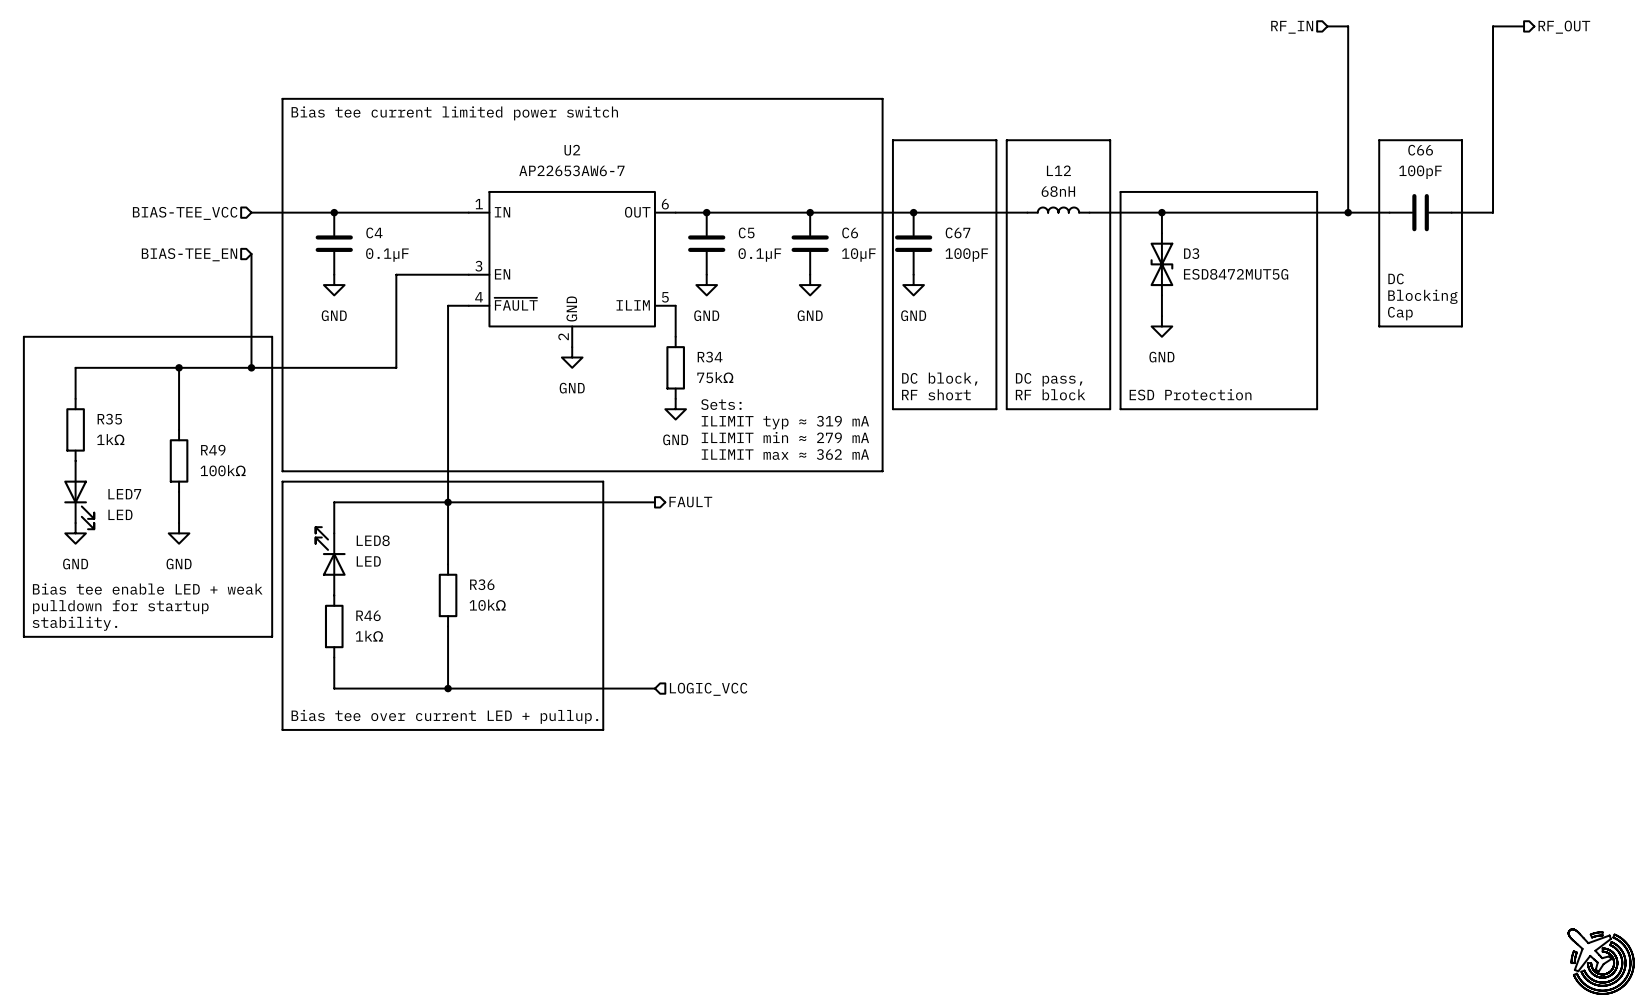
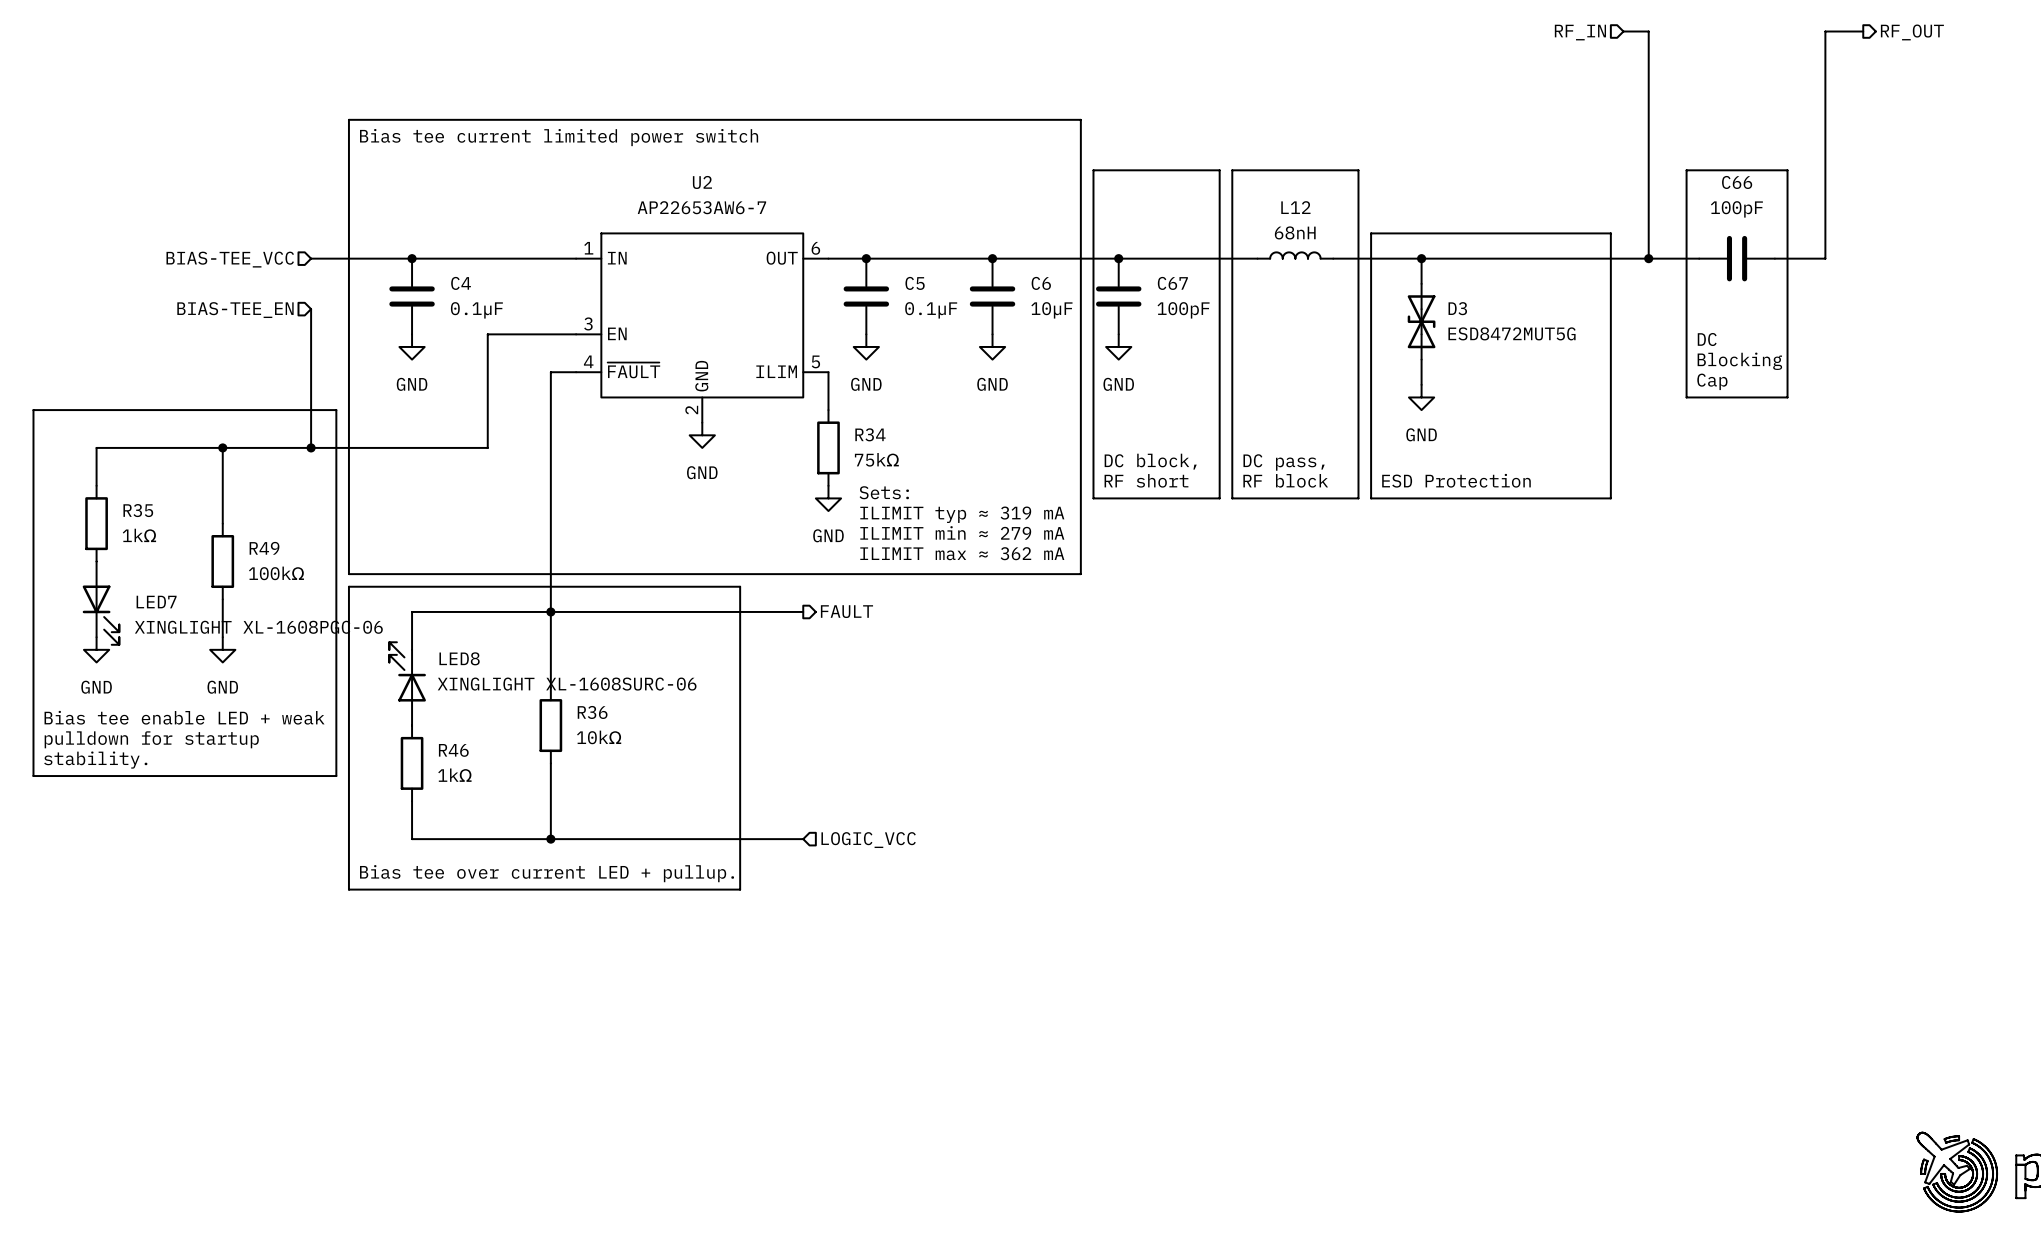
LED7 value: LED (120, 514) -> XINGLIGHT XL-1608PGC-06 (258, 627)
LED8 value: LED (368, 561) -> XINGLIGHT XL-1608SURC-06 (567, 684)

